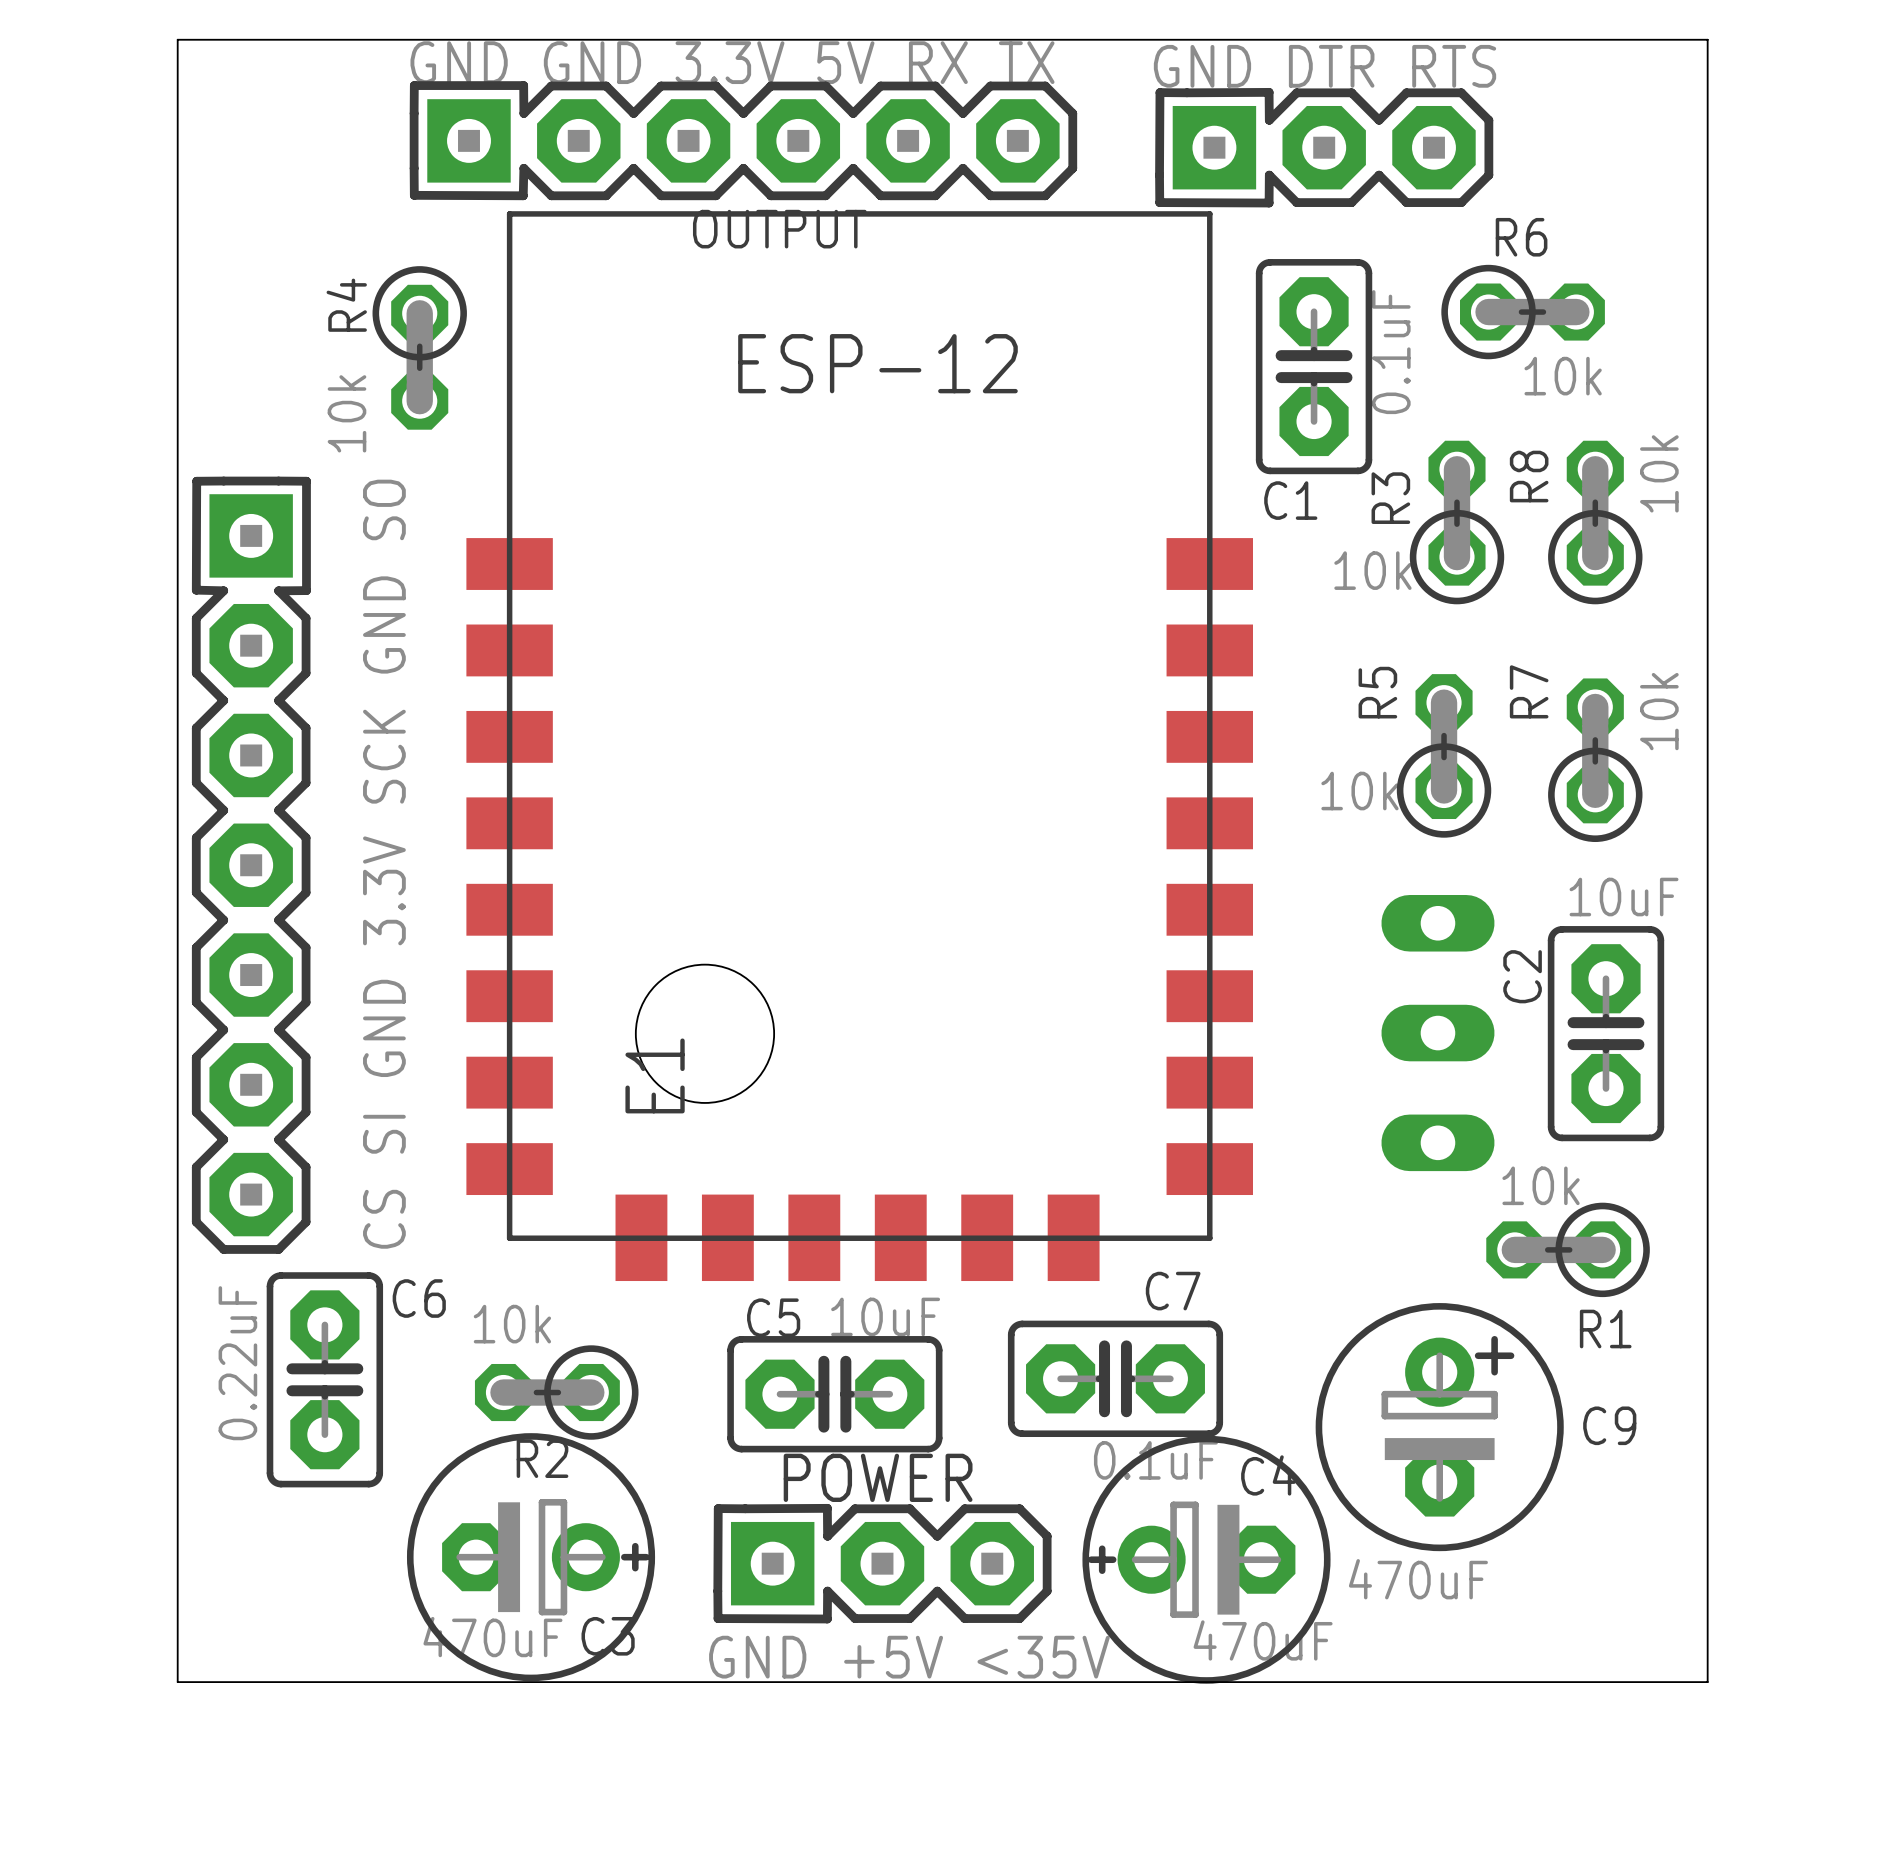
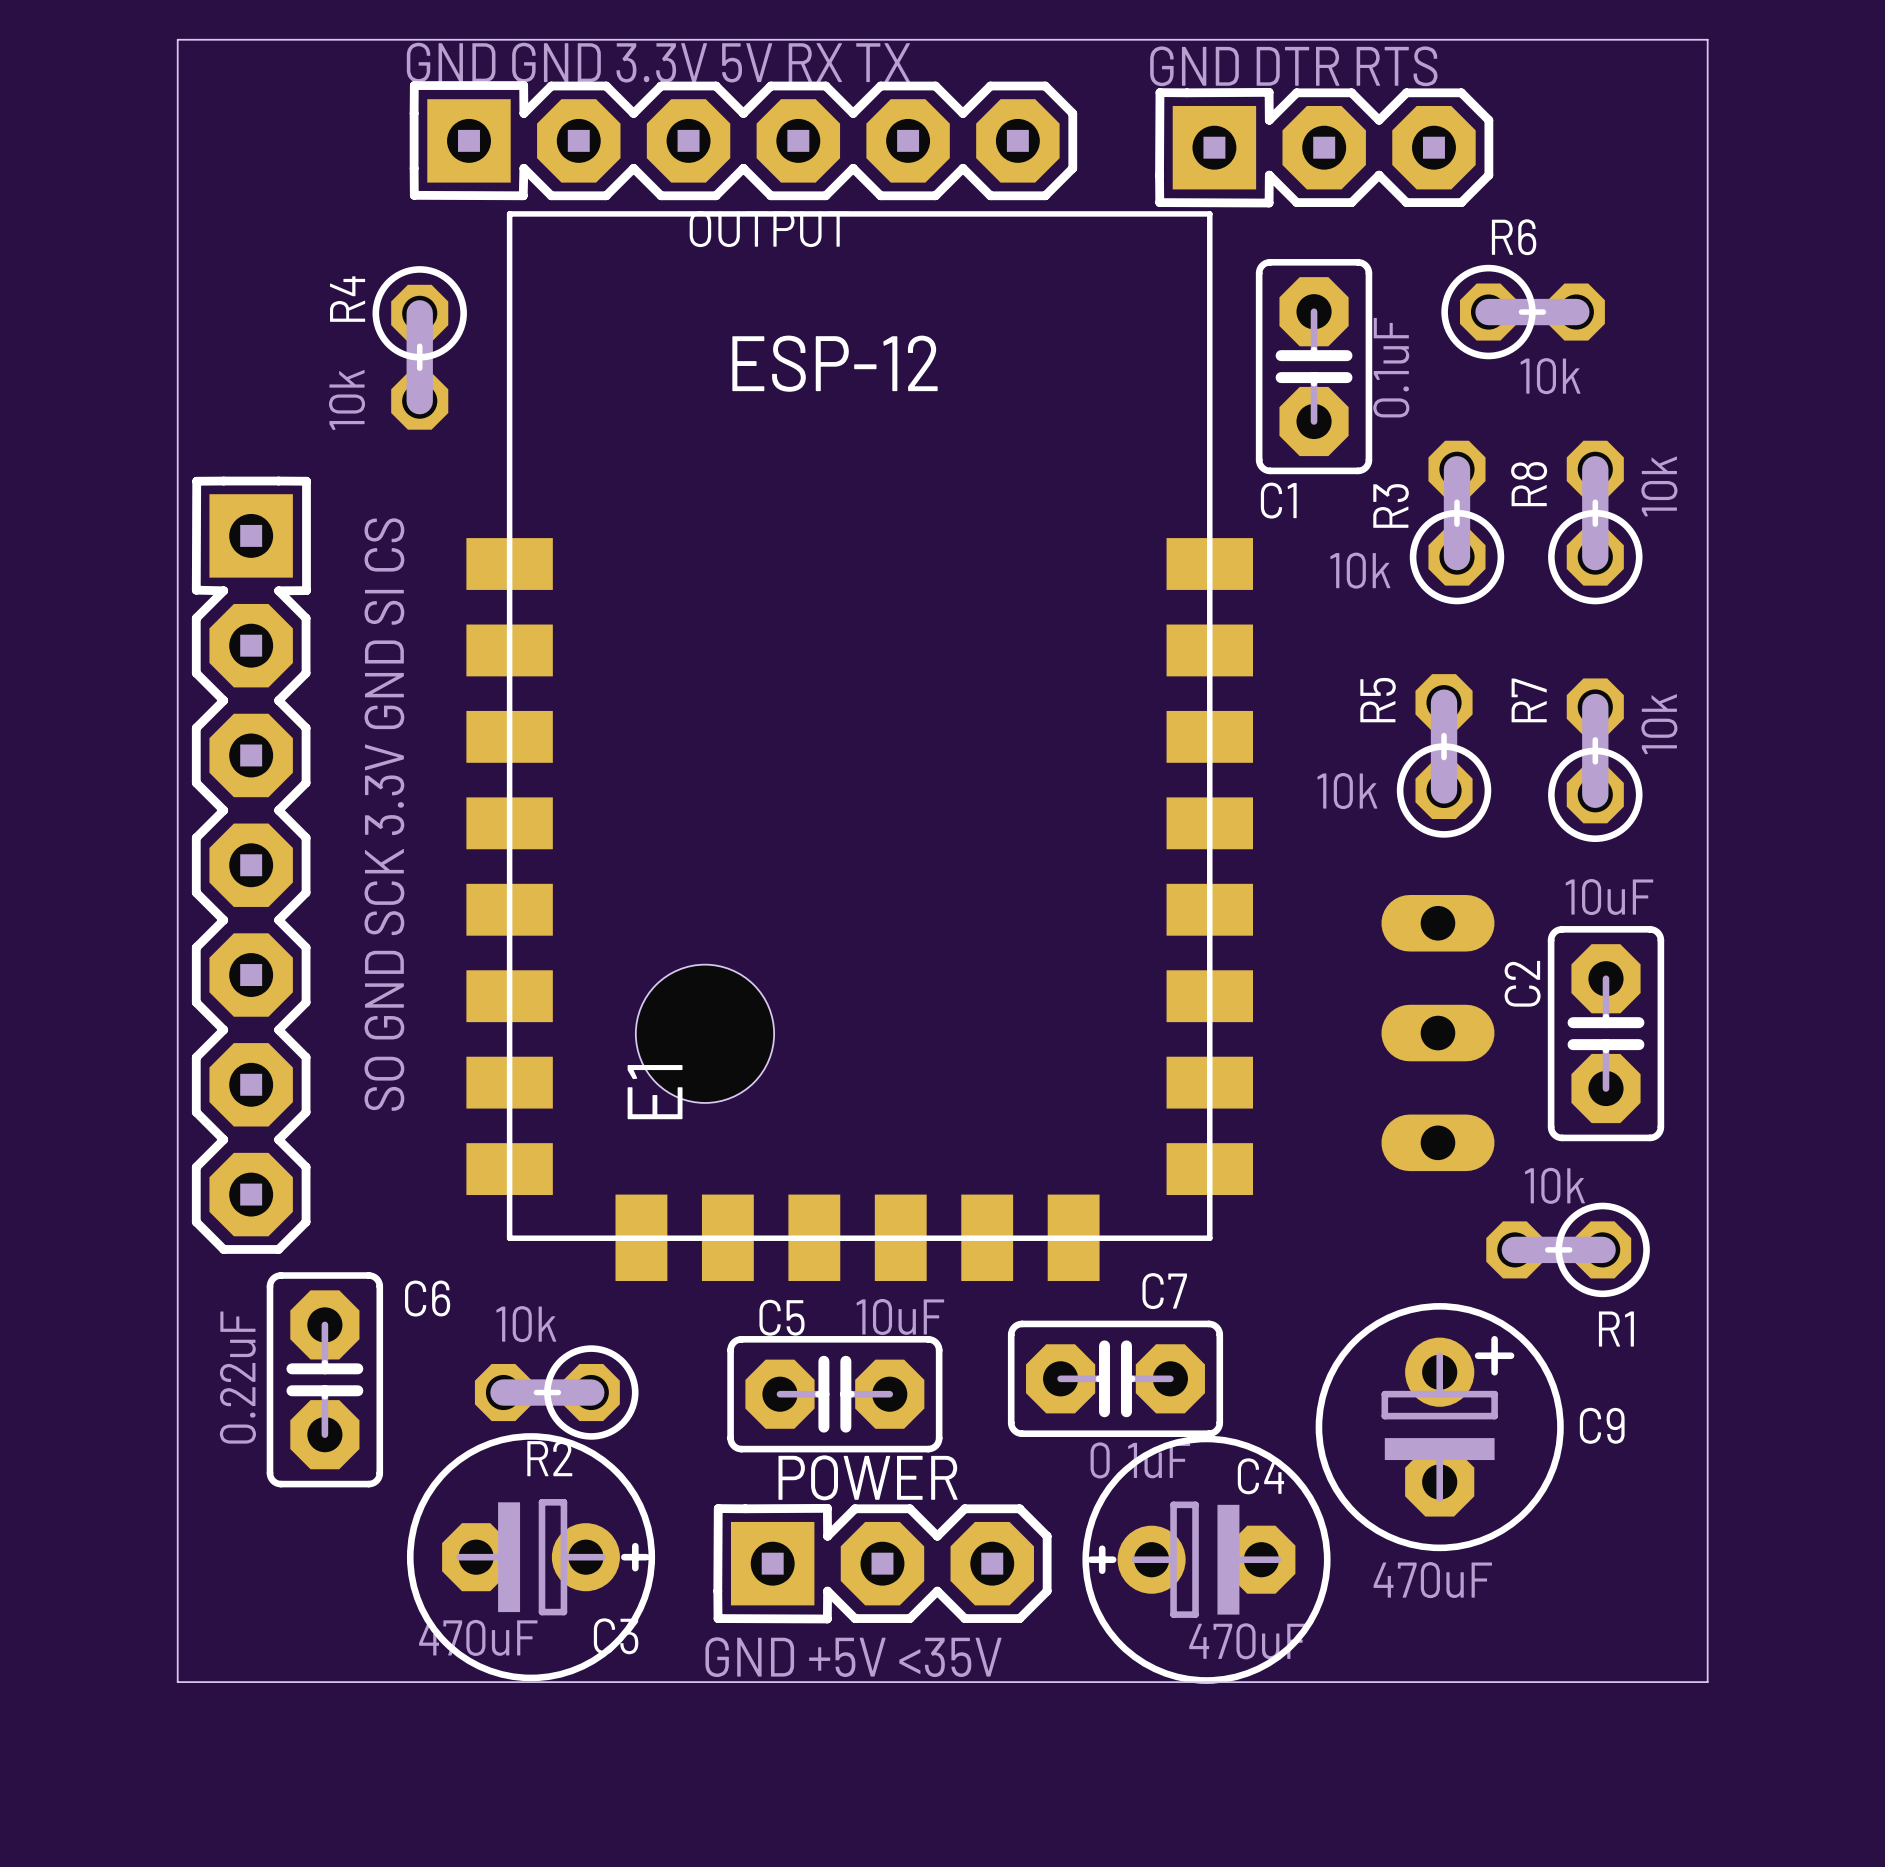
part value: CS SI GND 3.3V SCK GND SO (384, 864) -> SO GND SCK 3.3V GND SI CS (384, 814)

